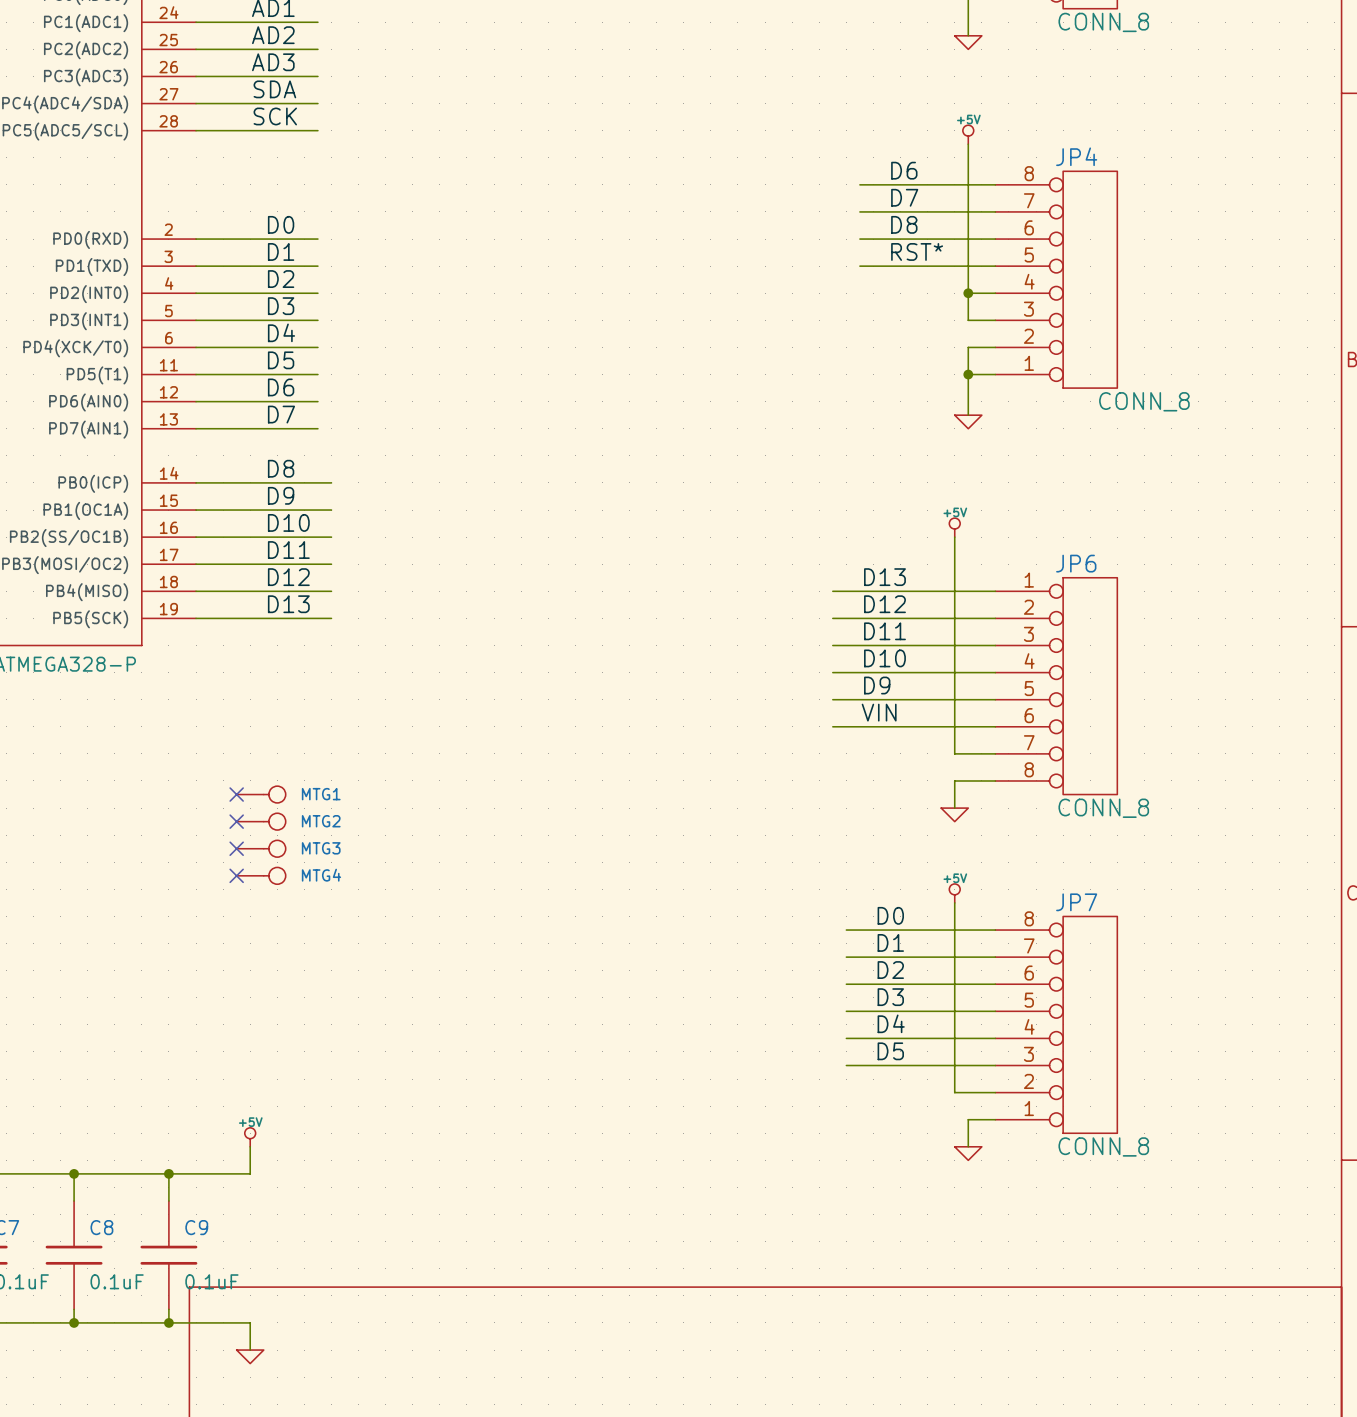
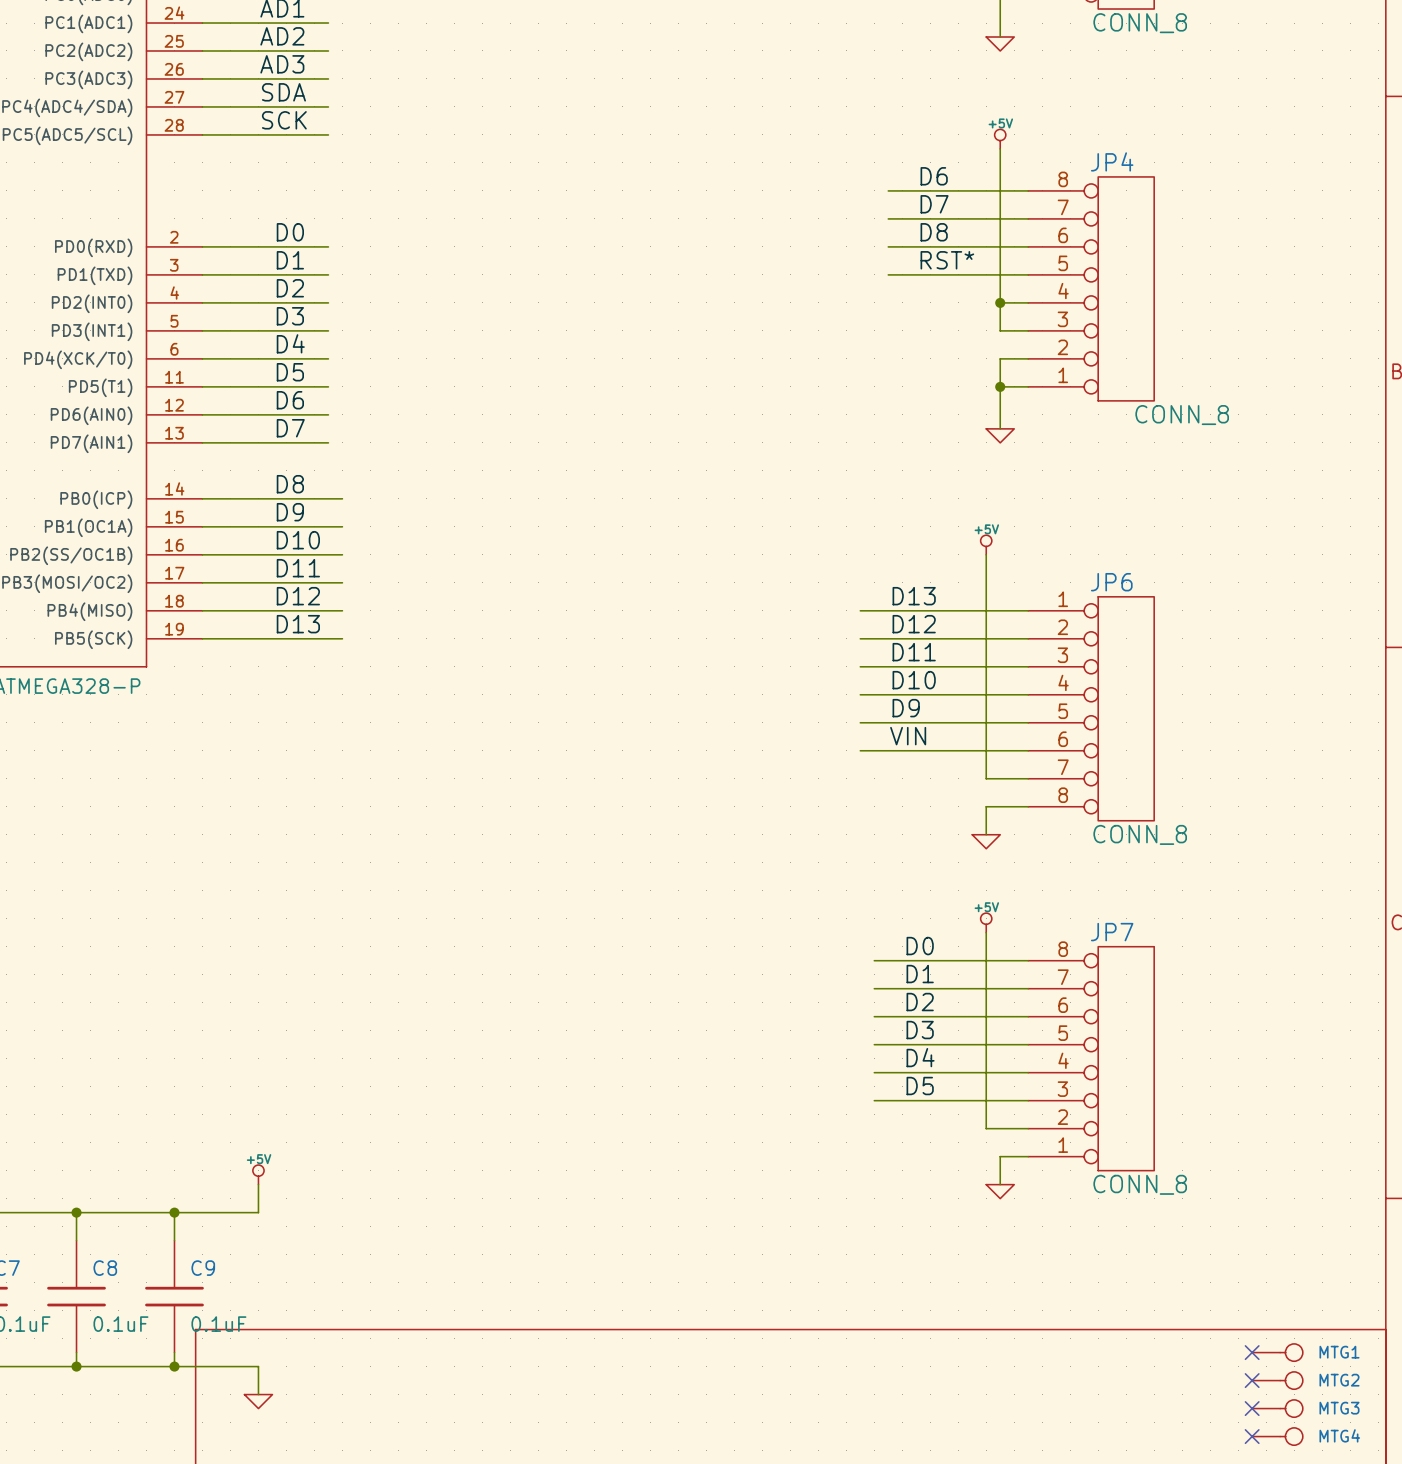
no-connect mark: (236, 794) -> none
MTG1 position: (261, 794) -> (1277, 1352)
no-connect mark: (236, 821) -> none
MTG2 position: (261, 821) -> (1277, 1380)
no-connect mark: (236, 848) -> none
MTG3 position: (261, 848) -> (1277, 1408)
no-connect mark: (236, 875) -> none
MTG4 position: (261, 875) -> (1277, 1436)
no-connect mark: none -> (1252, 1352)
no-connect mark: none -> (1252, 1380)
no-connect mark: none -> (1252, 1408)
no-connect mark: none -> (1252, 1436)

